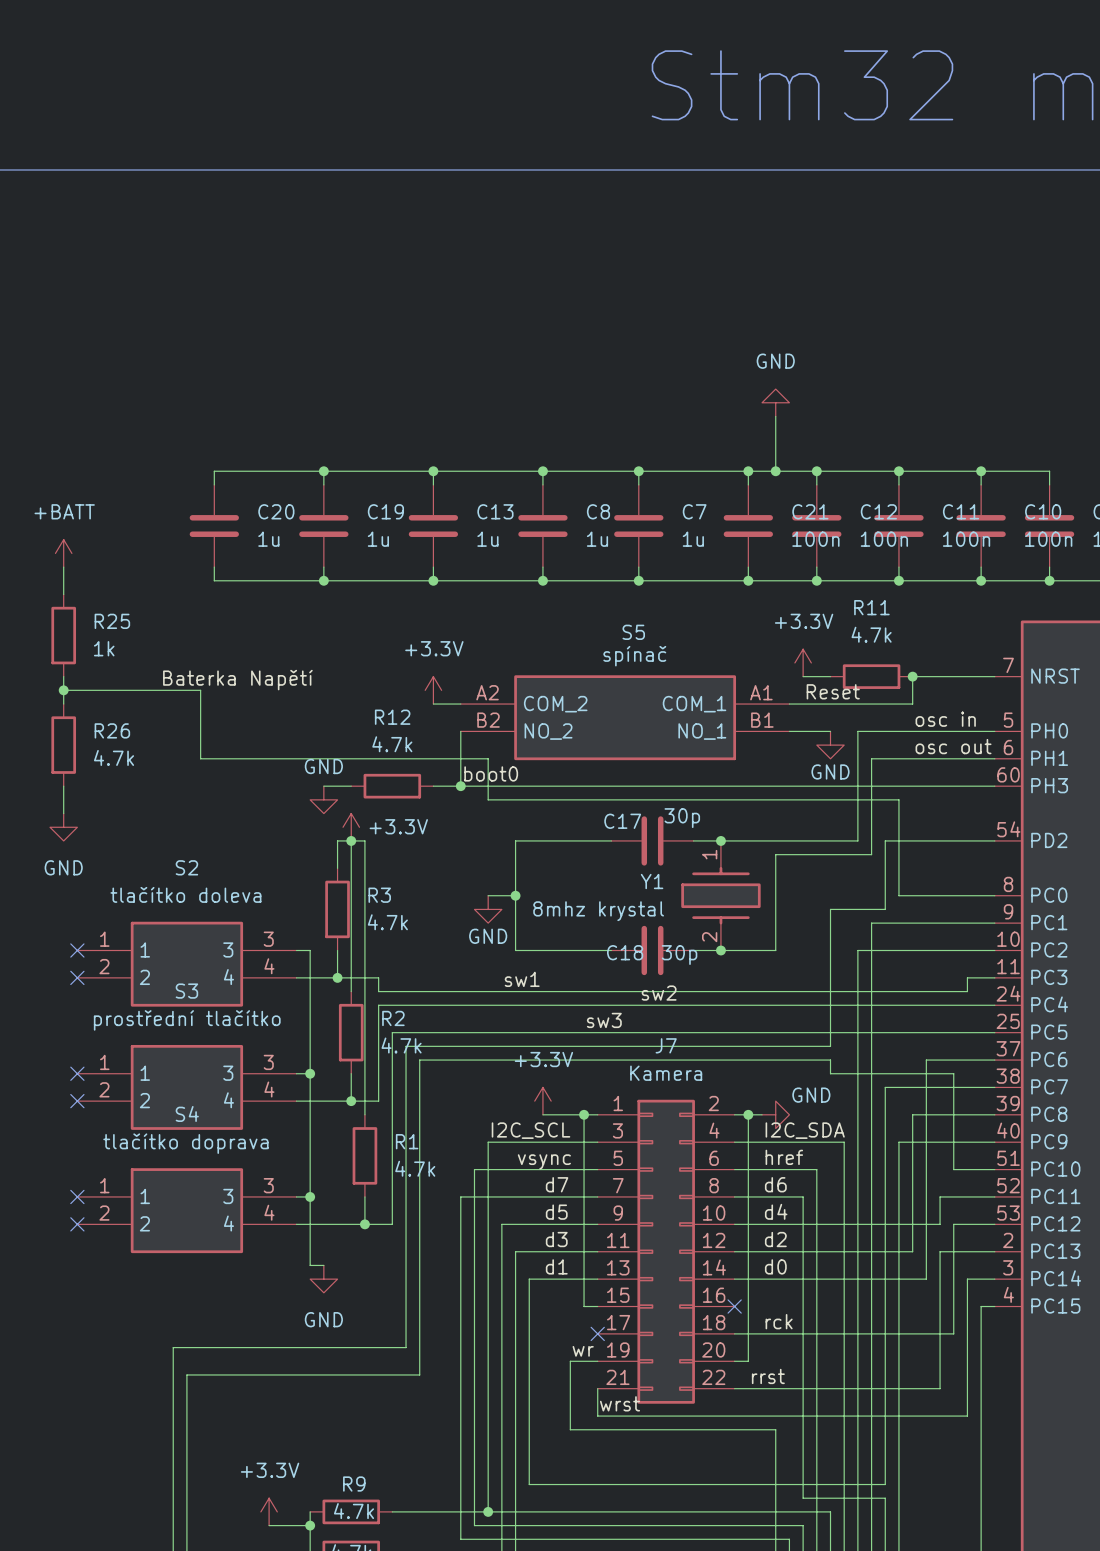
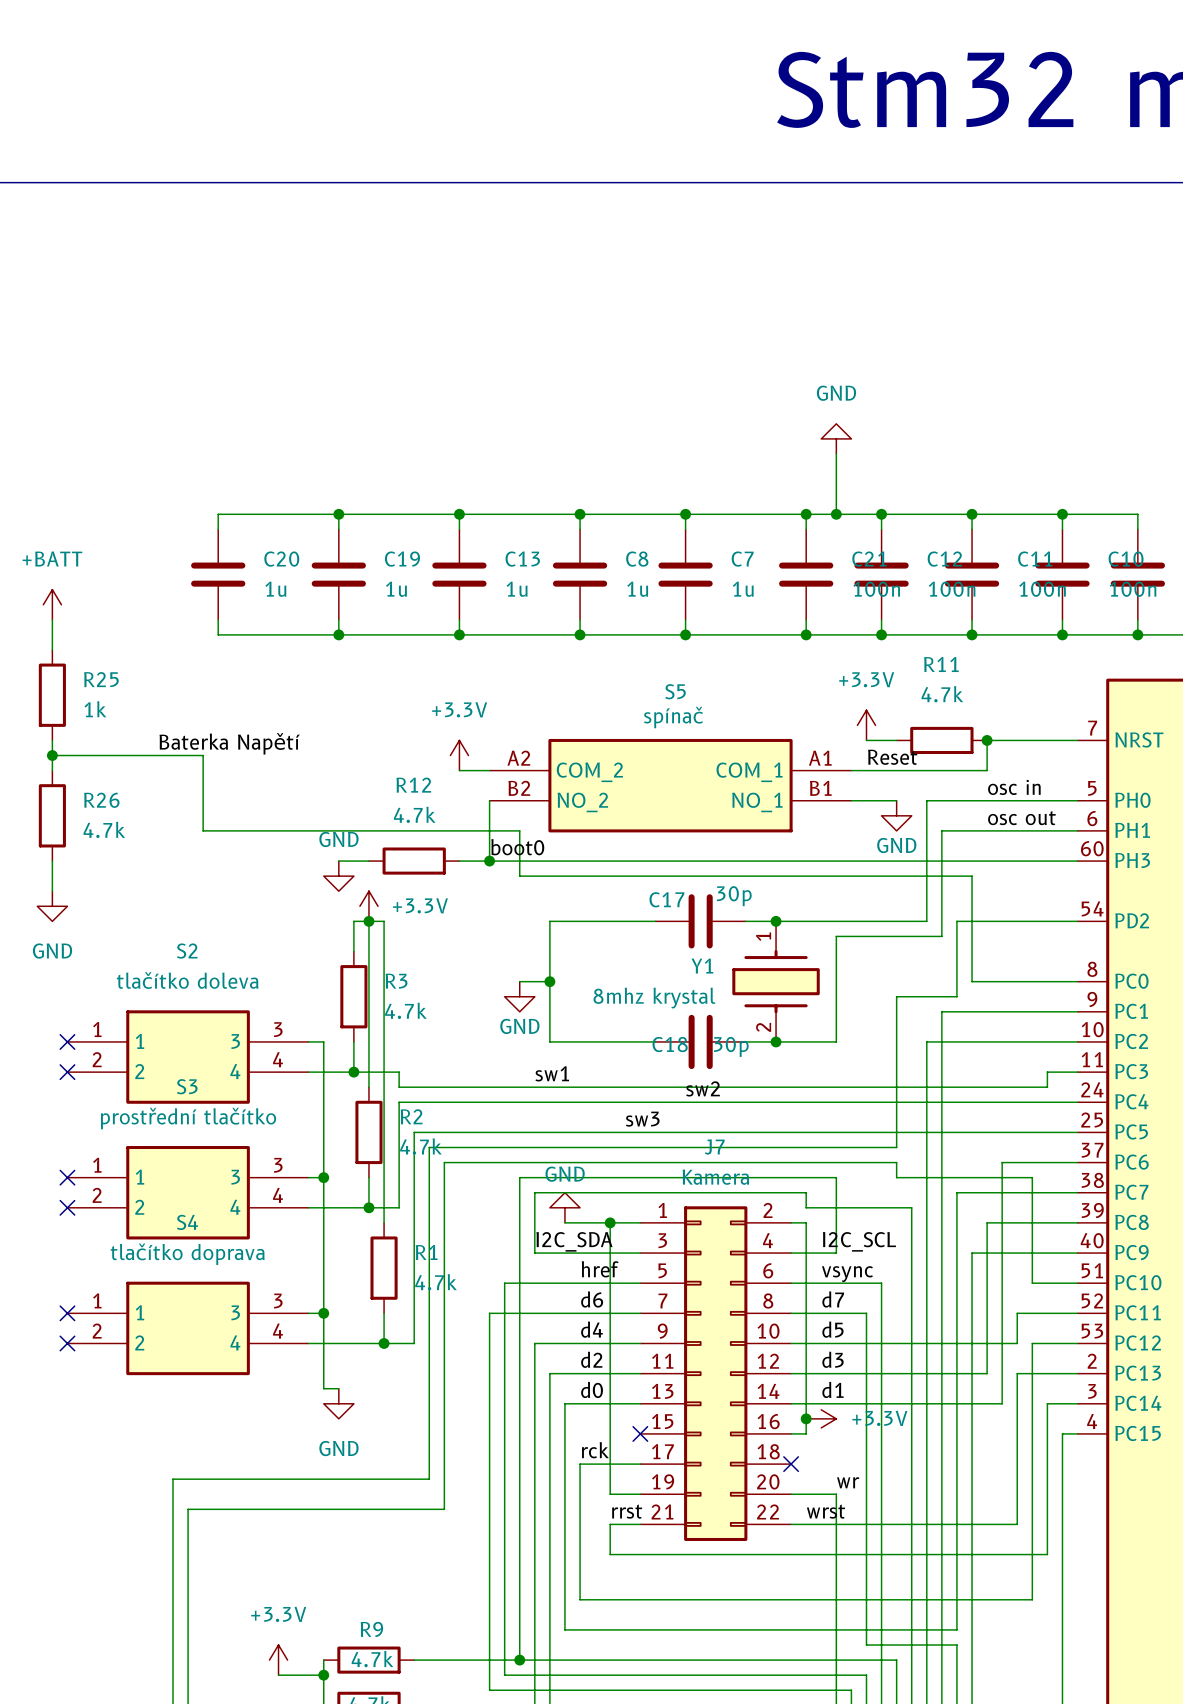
power symbol: +3.3V (542, 1101) -> none
wire: (584, 1114) (584, 1306) (597, 1306) -> none
junction position: (584, 1114) -> (610, 1222)
wire: (748, 1114) (762, 1114) -> (564, 1222) (580, 1222)
junction: (748, 1114) -> none
power symbol rotation: 0° (775, 1114) -> 90° counterclockwise (564, 1207)
power symbol position: GND (775, 1114) -> GND (564, 1207)
label: I2C_SCL (530, 1130) -> I2C_SDA (574, 1241)
label: I2C_SDA (805, 1130) -> I2C_SCL (859, 1241)
wire: (488, 1142) (501, 1142) -> (519, 1253) (519, 1177) (836, 1177) (836, 1253)
wire: (775, 1142) (844, 1142) -> (534, 1253) (534, 1192) (806, 1192) (806, 1207) (911, 1207) (911, 1253)
label: none -> href (600, 1269)
label: href (784, 1157) -> vsync (847, 1274)
label: vsync (544, 1161) -> none
label: d7 (557, 1184) -> d6 (592, 1299)
label: d6 (775, 1184) -> d7 (833, 1299)
label: d4 (776, 1211) -> d5 (832, 1329)
label: d5 (556, 1212) -> d4 (592, 1329)
label: d3 (556, 1239) -> d2 (591, 1359)
label: d2 (775, 1239) -> d3 (833, 1359)
label: d1 (556, 1266) -> d0 (592, 1389)
label: d0 (775, 1266) -> d1 (832, 1389)
junction: none -> (806, 1418)
power symbol: none -> +3.3V (821, 1418)
no-connect mark position: (734, 1306) -> (791, 1464)
wire: (748, 1306) (748, 1361) -> (806, 1433) (791, 1433)
label position: rck (779, 1321) -> rck (595, 1450)
no-connect mark position: (597, 1333) -> (640, 1433)
wire: (734, 1333) (953, 1333) -> (640, 1464) (580, 1464) (580, 1599) (1032, 1599) (1032, 1464)
label position: wr (583, 1351) -> wr (848, 1482)
wire: (570, 1361) (570, 1388) -> (610, 1494) (610, 1222)
wire: none -> (806, 1494) (836, 1494) (836, 1569)
label: rrst (768, 1376) -> wrst (826, 1511)
wire: (597, 1388) (597, 1416) -> (640, 1524) (610, 1524)
label: wrst (619, 1403) -> rrst (627, 1511)
wire: (570, 1416) (570, 1429) (775, 1429) -> (610, 1554) (640, 1554)

